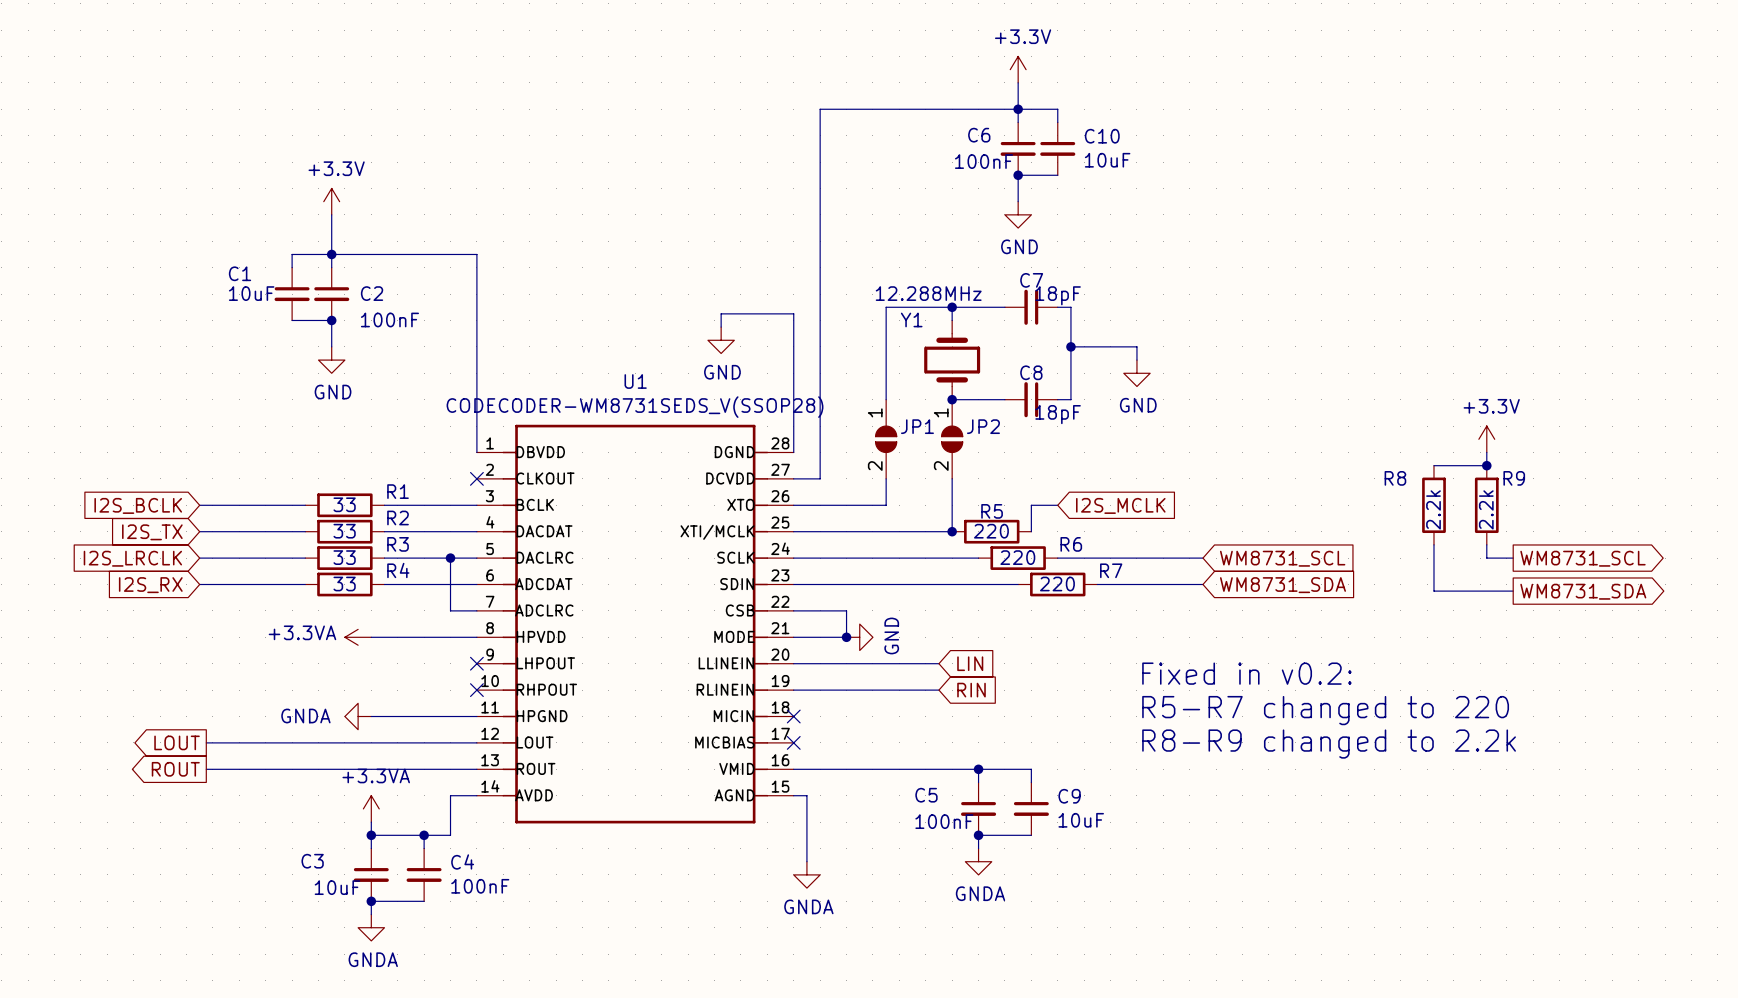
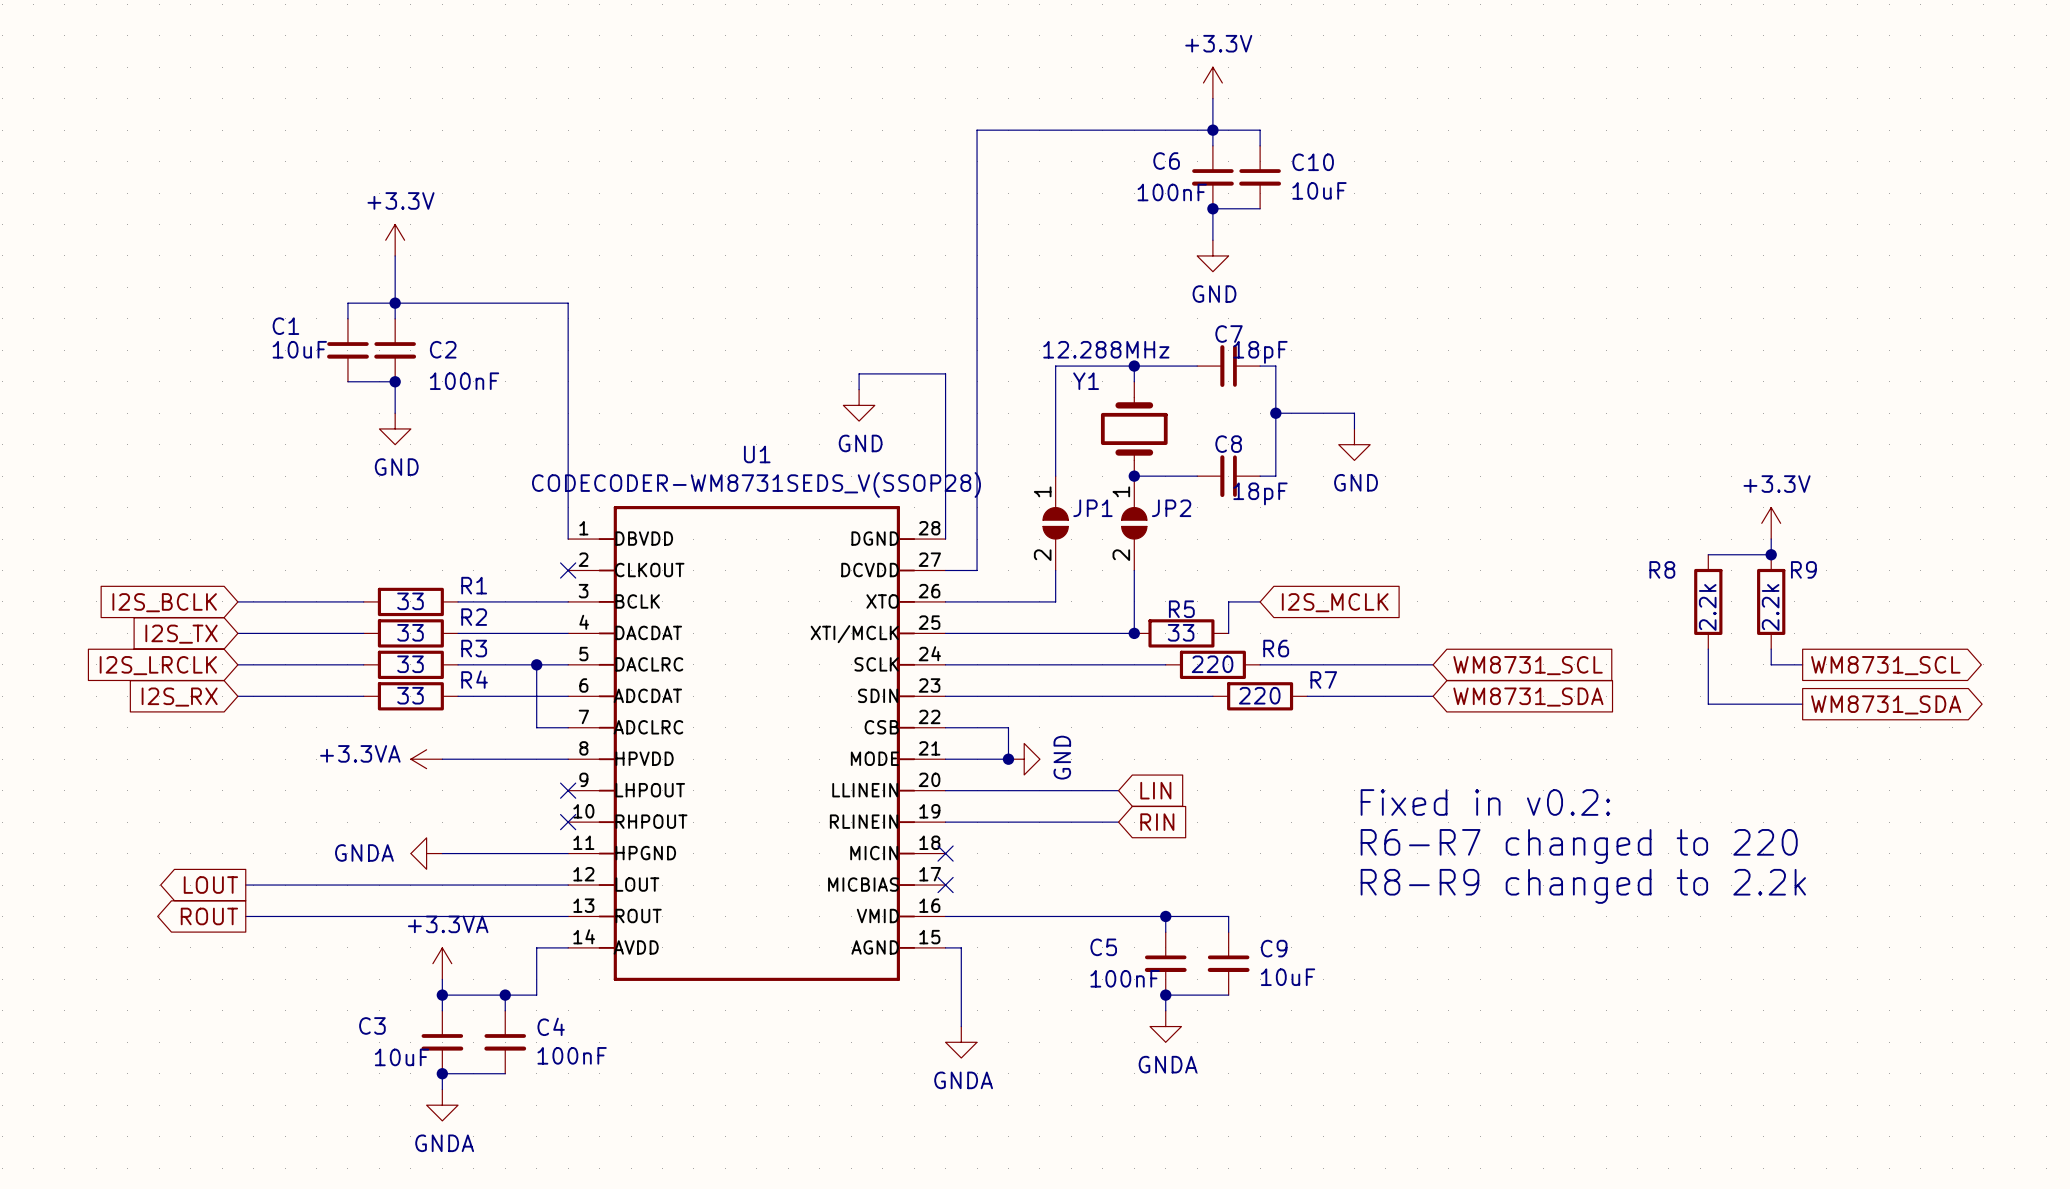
R5 value: 220 (991, 531) -> 33 (1181, 632)
text: R5-R7 changed to 220 (1325, 710) -> R6-R7 changed to 220 (1579, 846)

